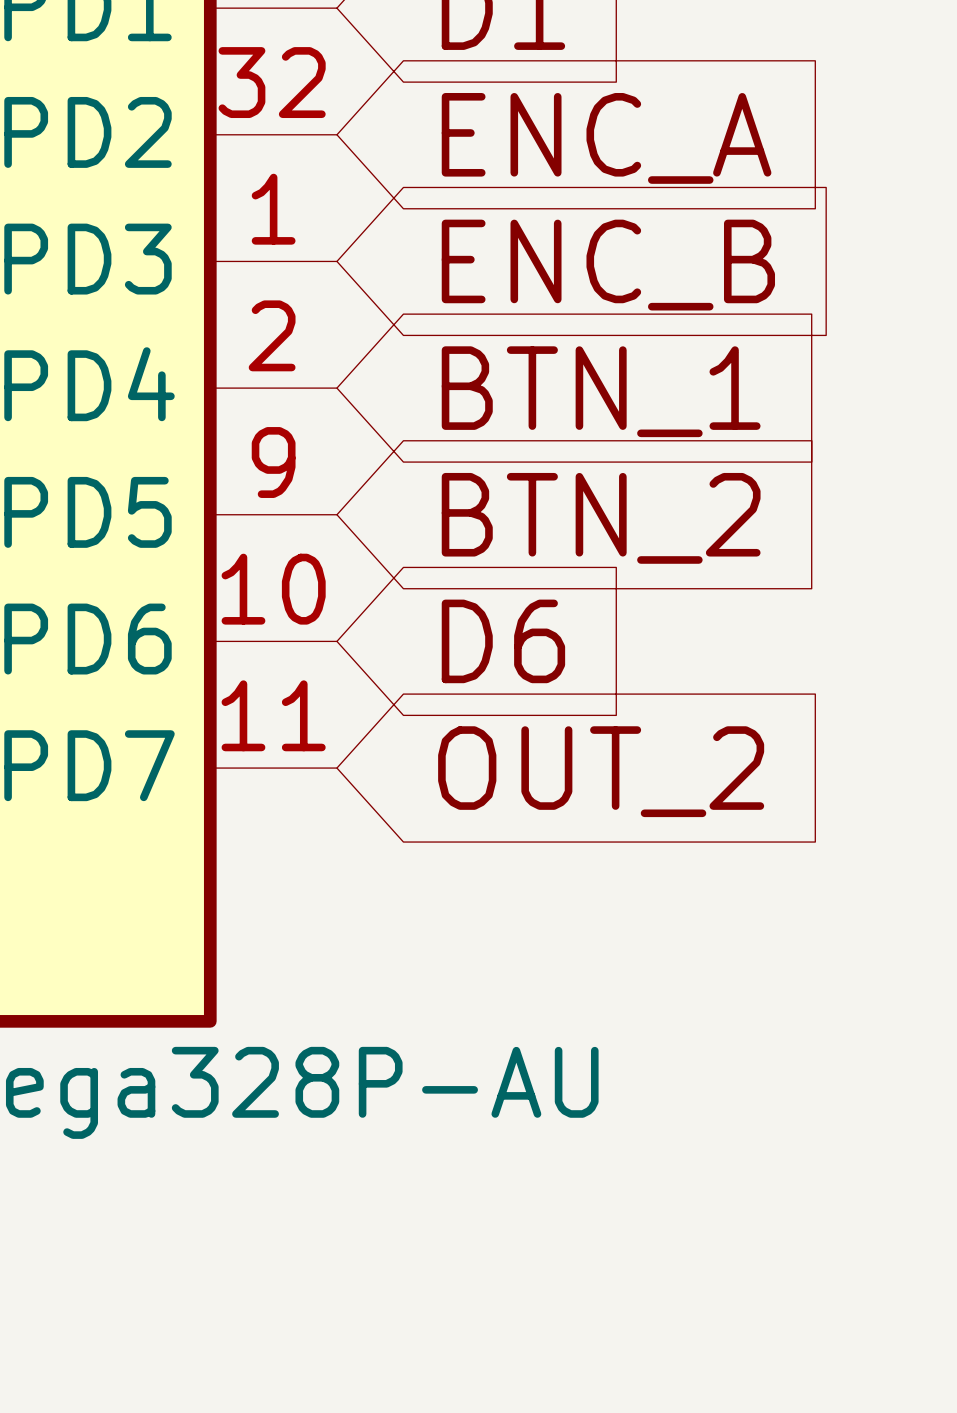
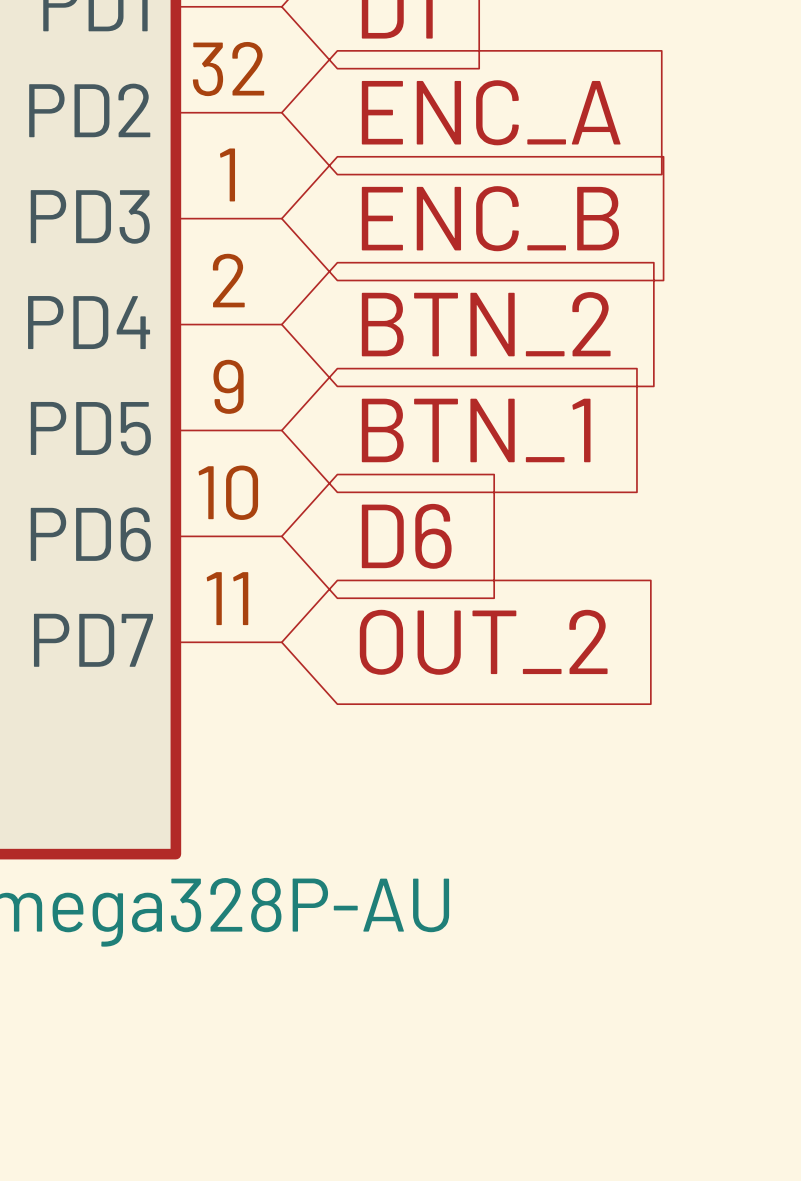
global label: BTN_1 (601, 391) -> BTN_2 (486, 324)
global label: BTN_2 (601, 518) -> BTN_1 (476, 430)

